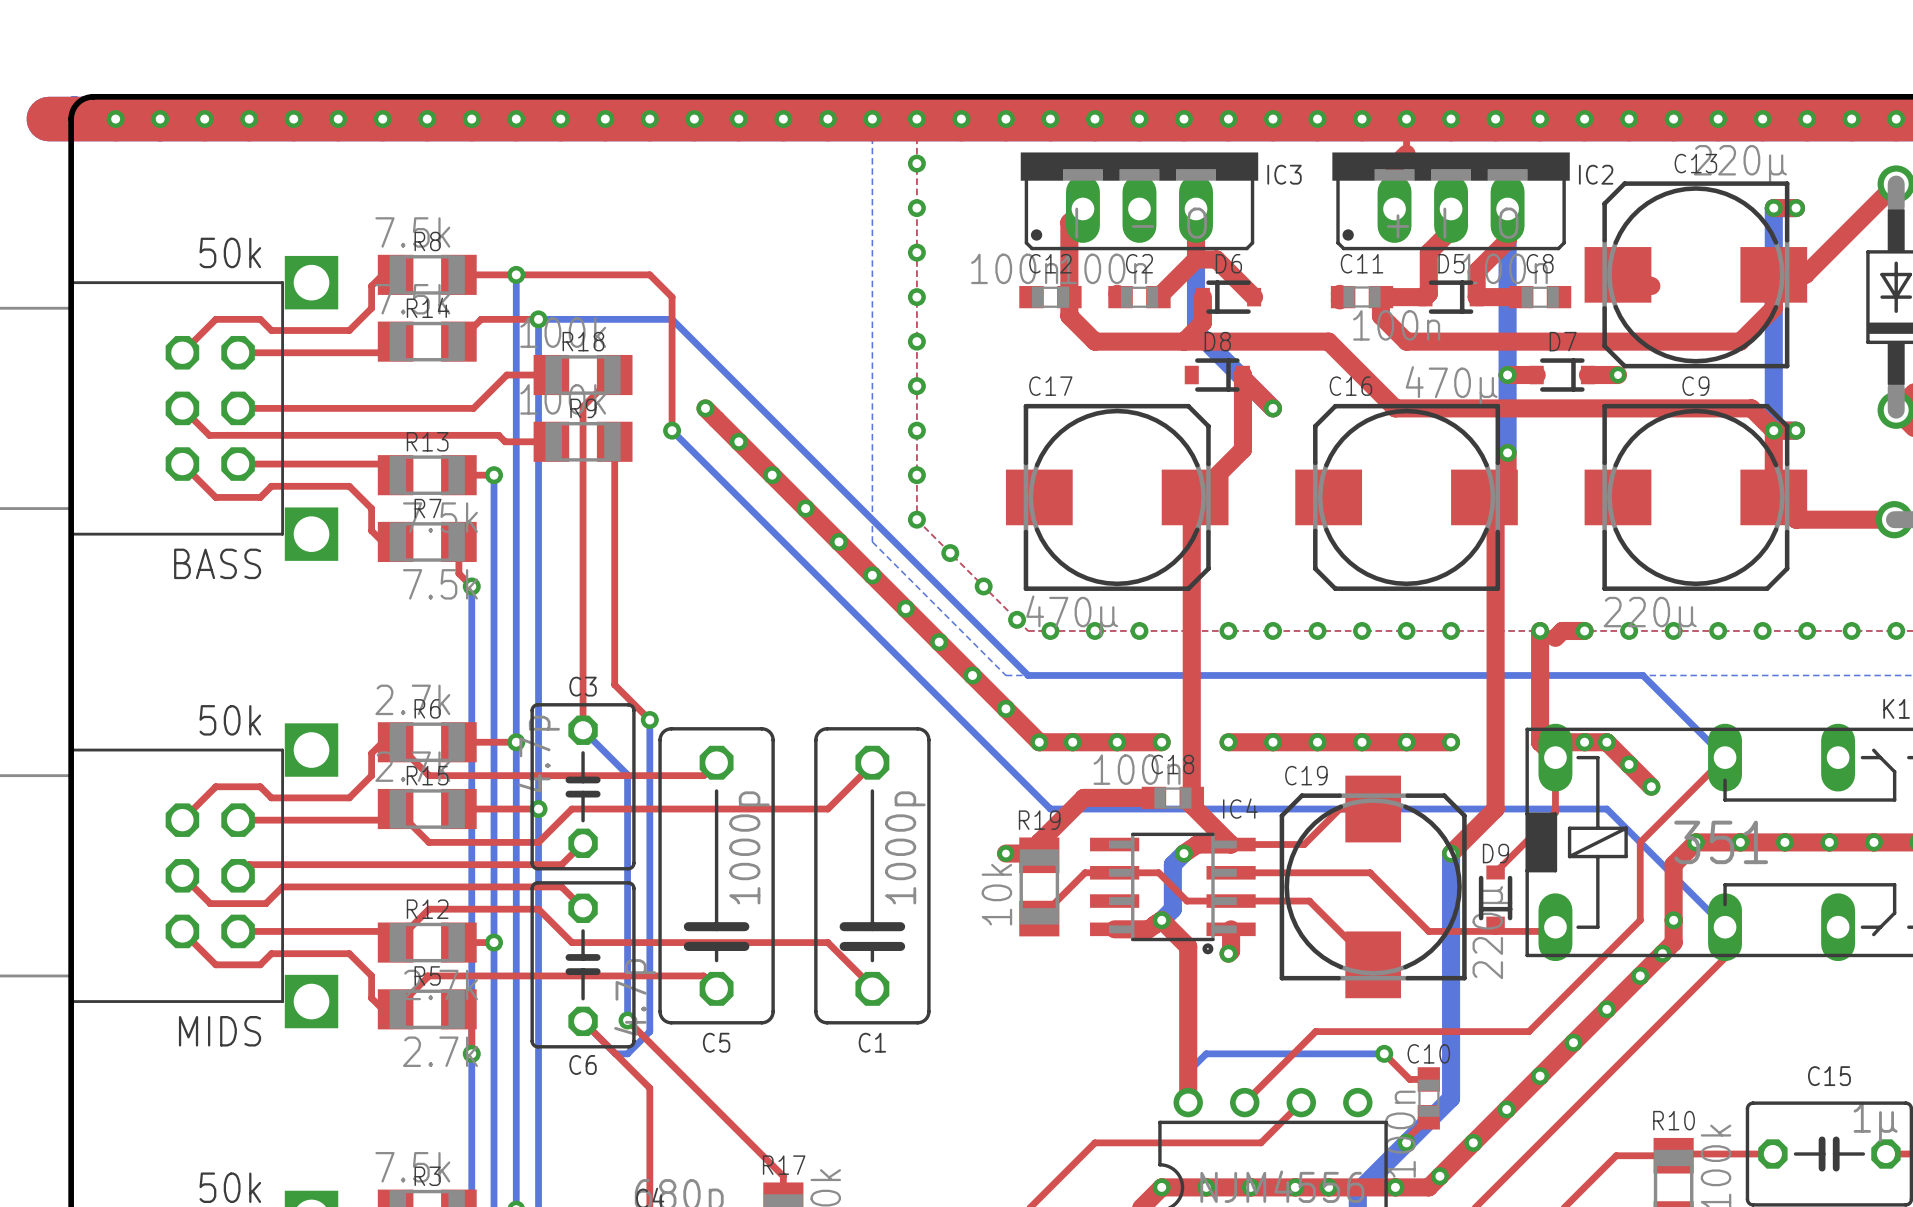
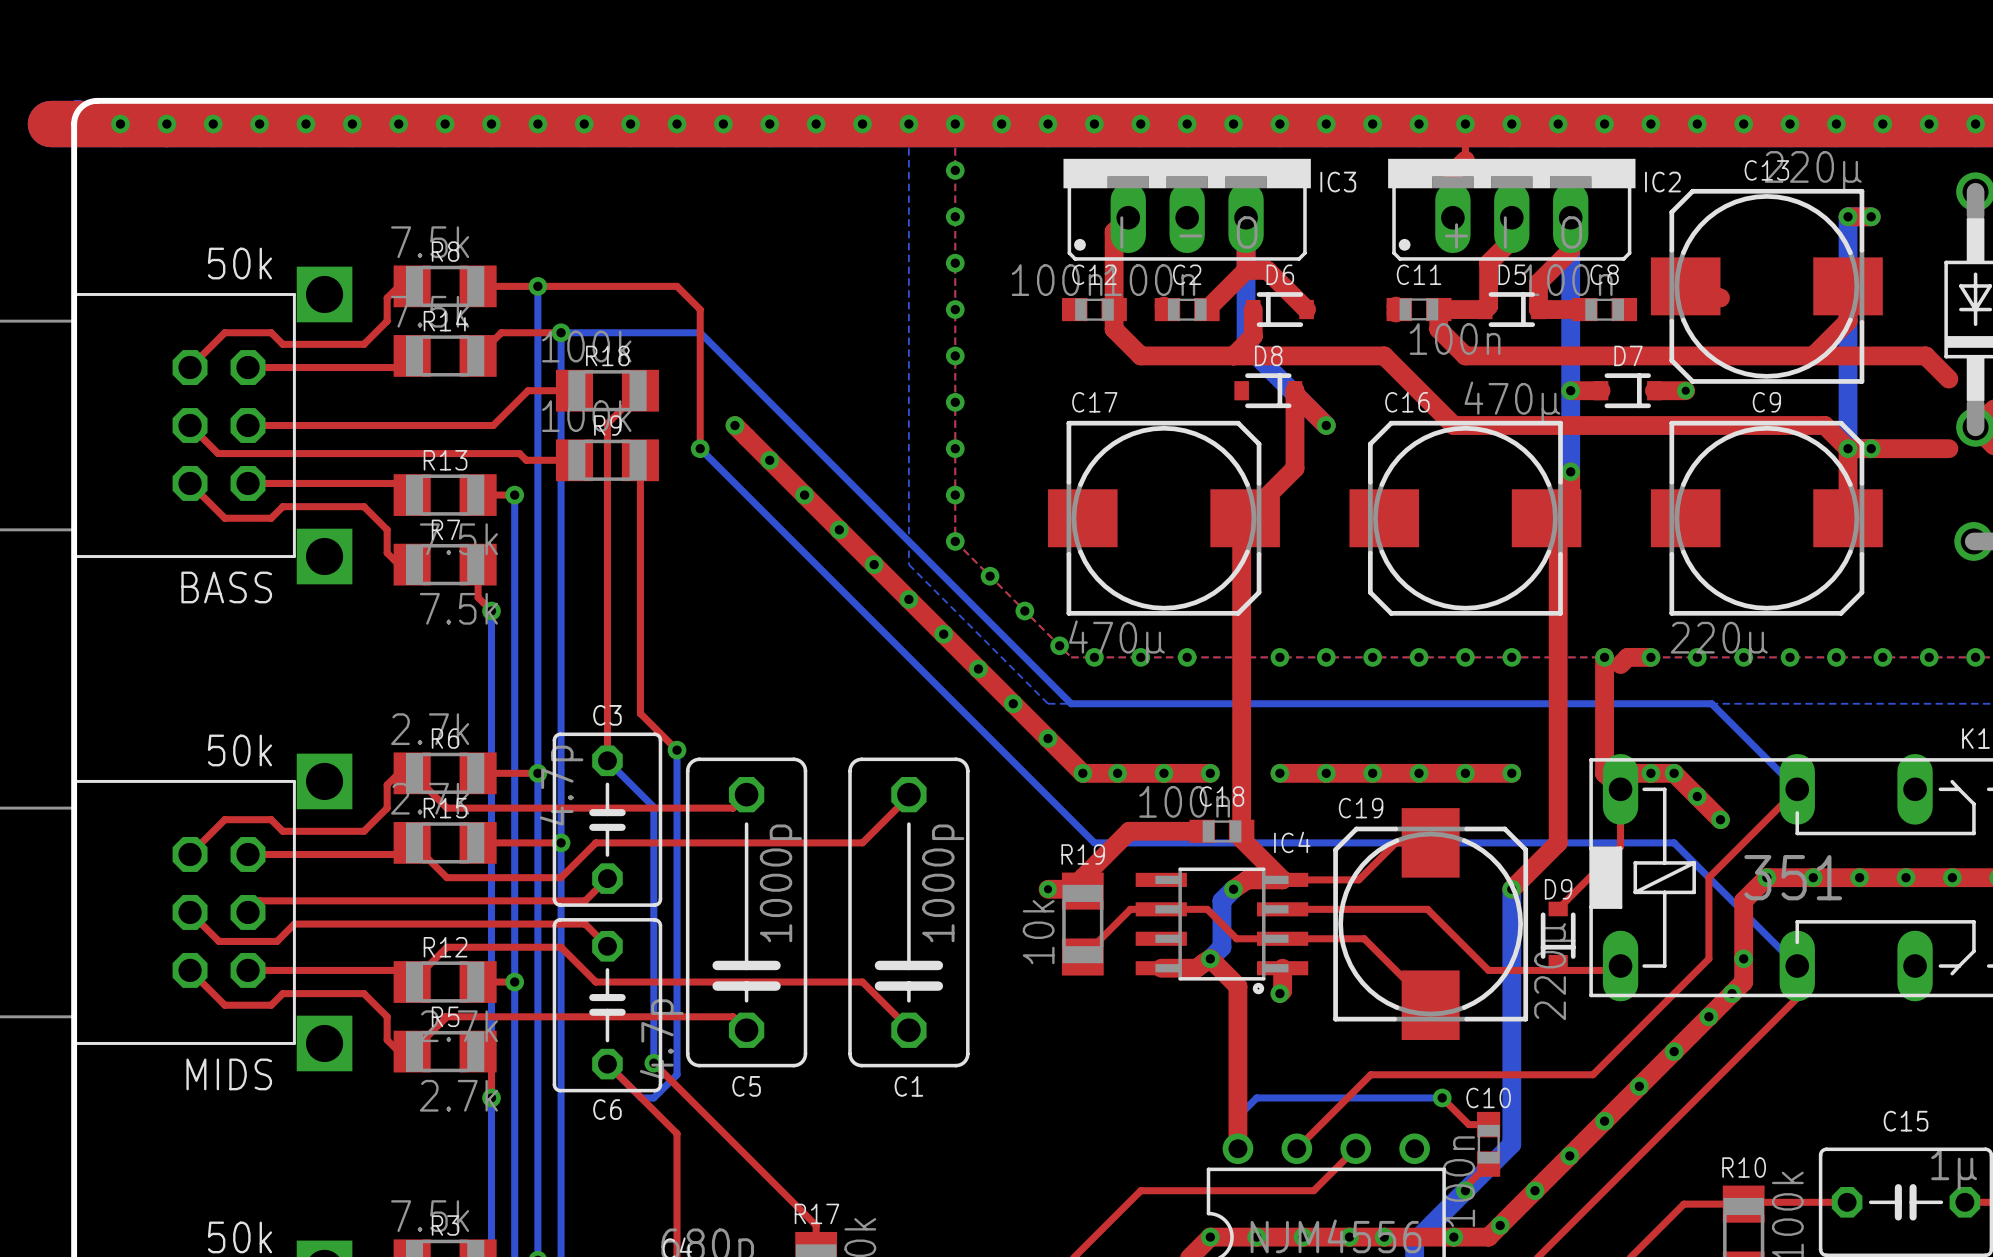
top track: (1896, 184) (1805, 274) (1773, 274) -> none
top track: none -> (1813, 355) (1925, 355) (1948, 379)
top track: none -> (1871, 448) (1948, 448)
top track: (1773, 497) (1796, 519) (1894, 519) -> none

